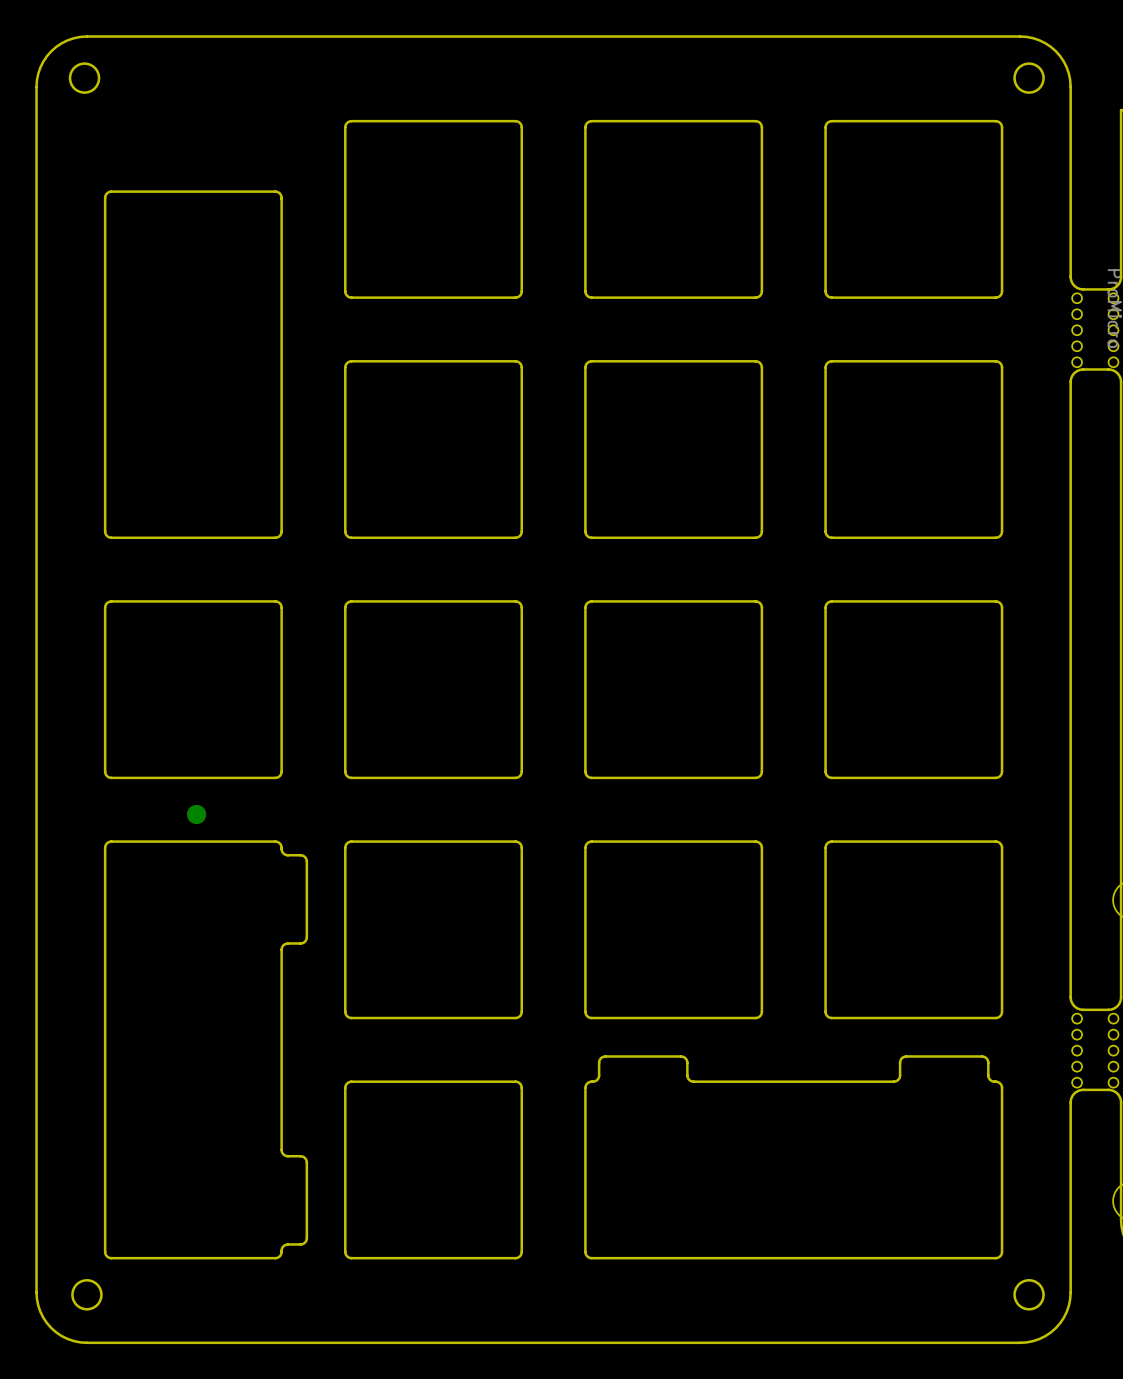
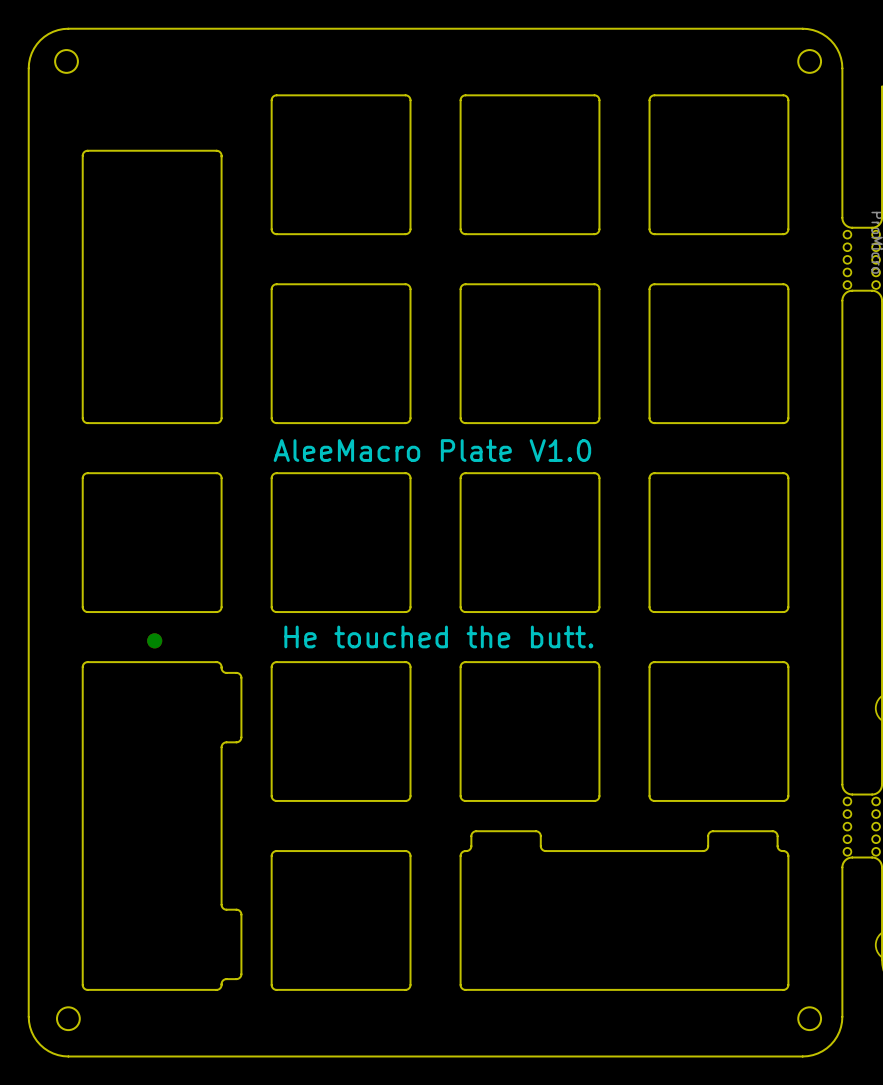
text: none -> AleeMacro Plate V1.0 (432, 450)
text: none -> He touched the butt. (438, 636)

